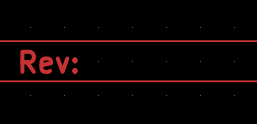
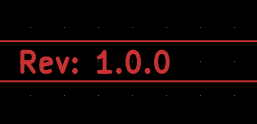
title block: Rev: (49, 61) -> Rev: 1.0.0 (95, 61)

